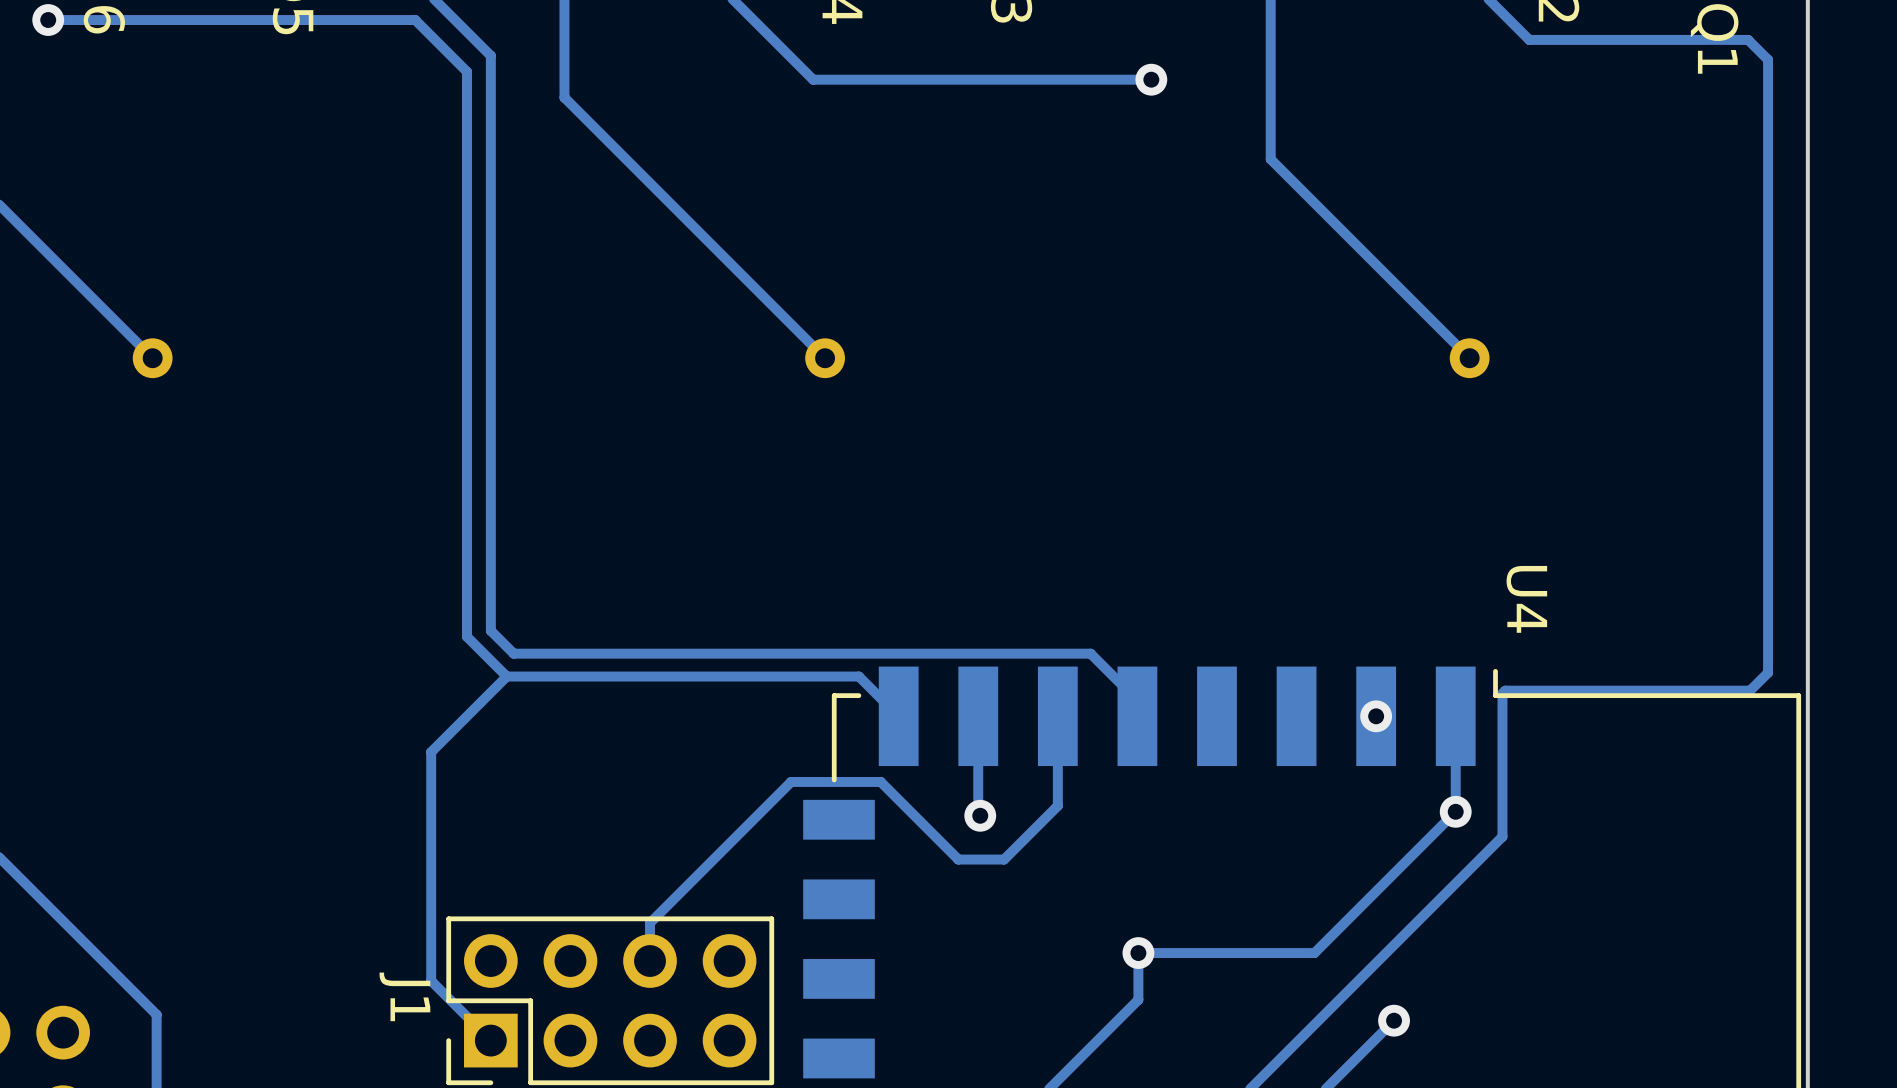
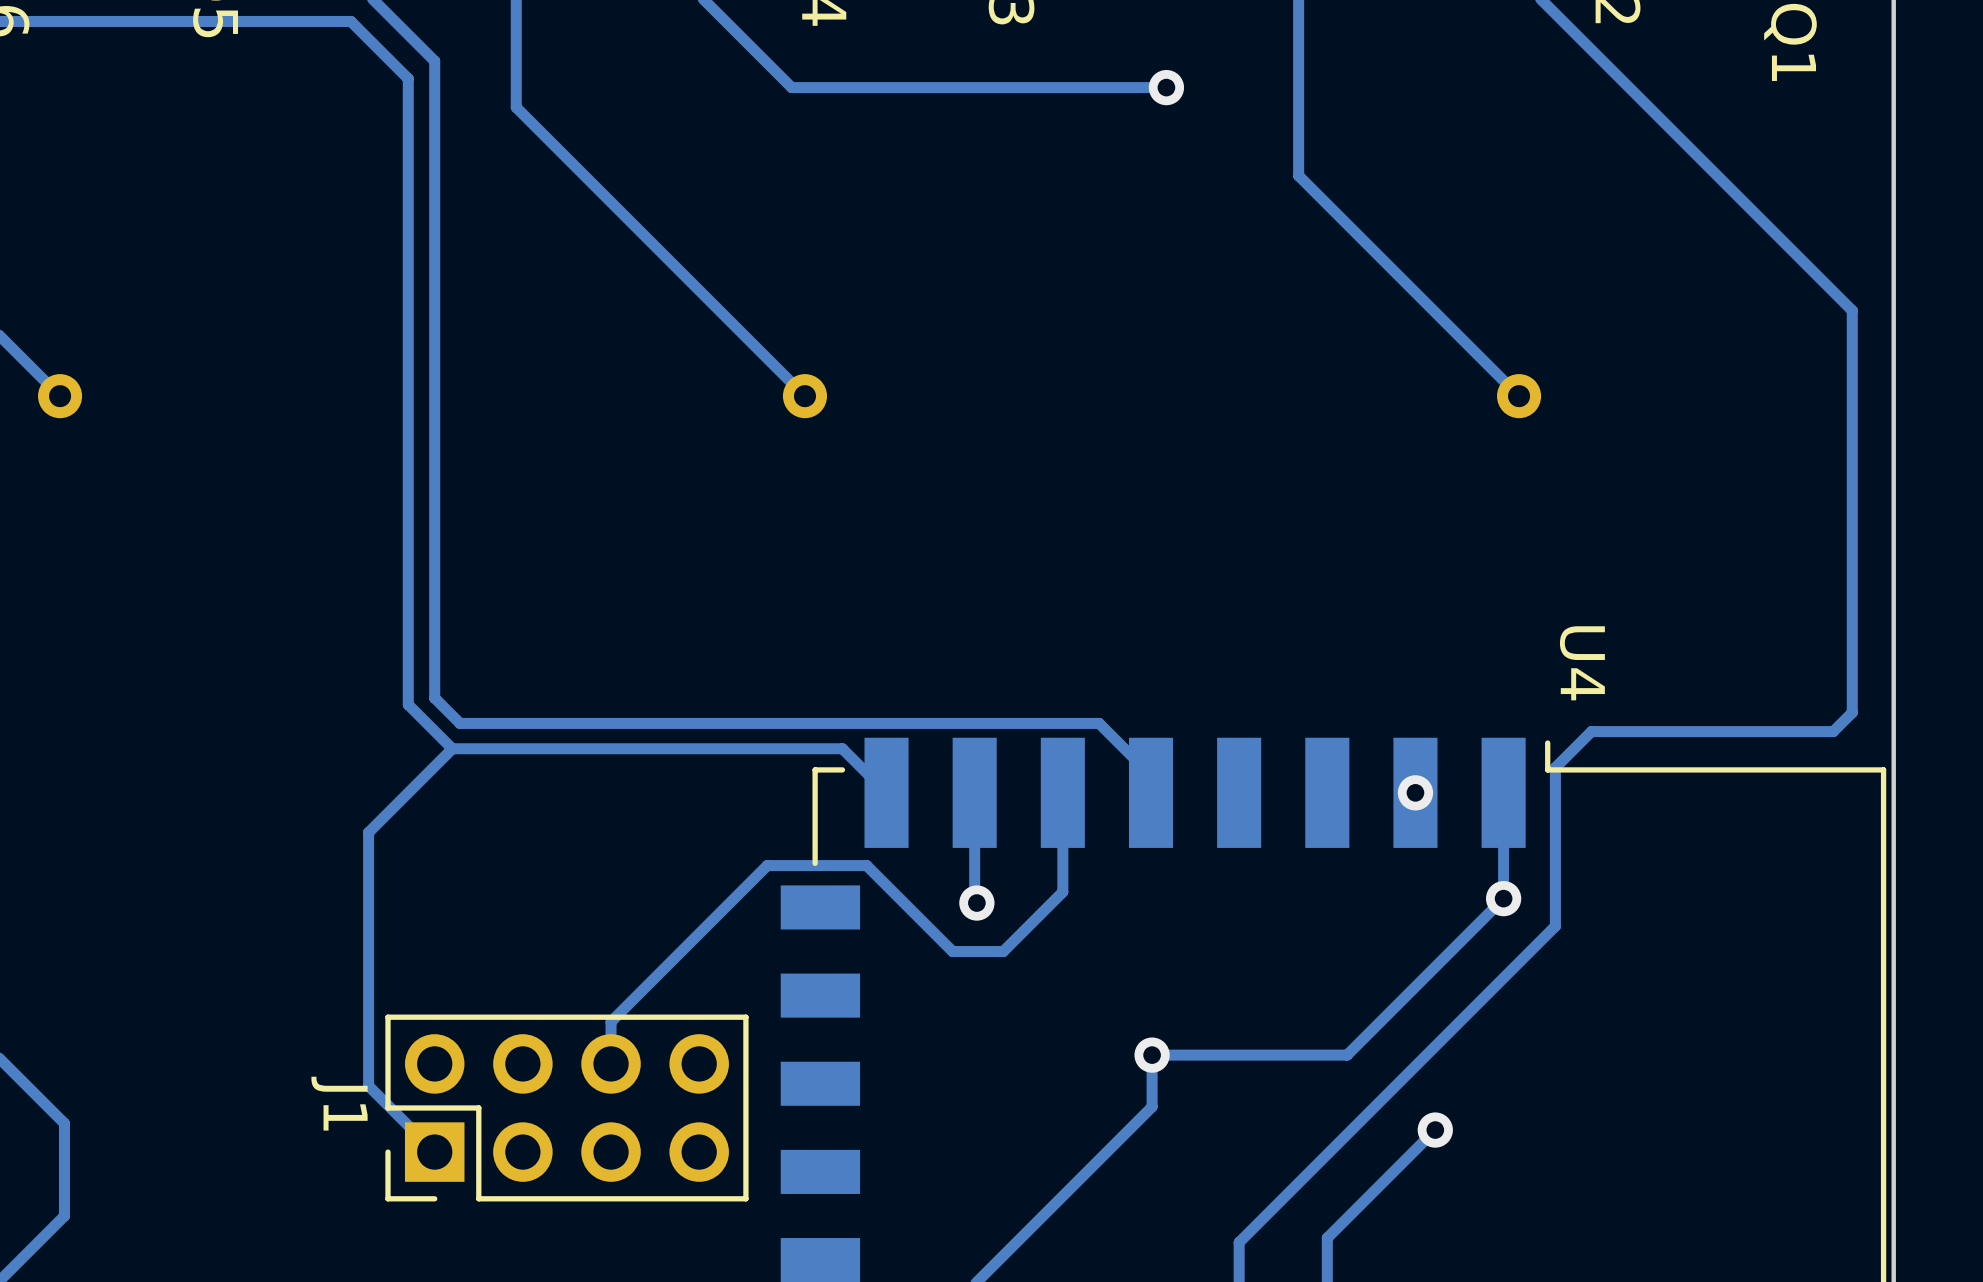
track: (1529, 39) (1748, 39) (1768, 59) (1768, 672) (1750, 690) (1505, 690) -> (1585, 43) (1852, 310) (1852, 712) (1833, 731) (1591, 731) (1558, 764)

